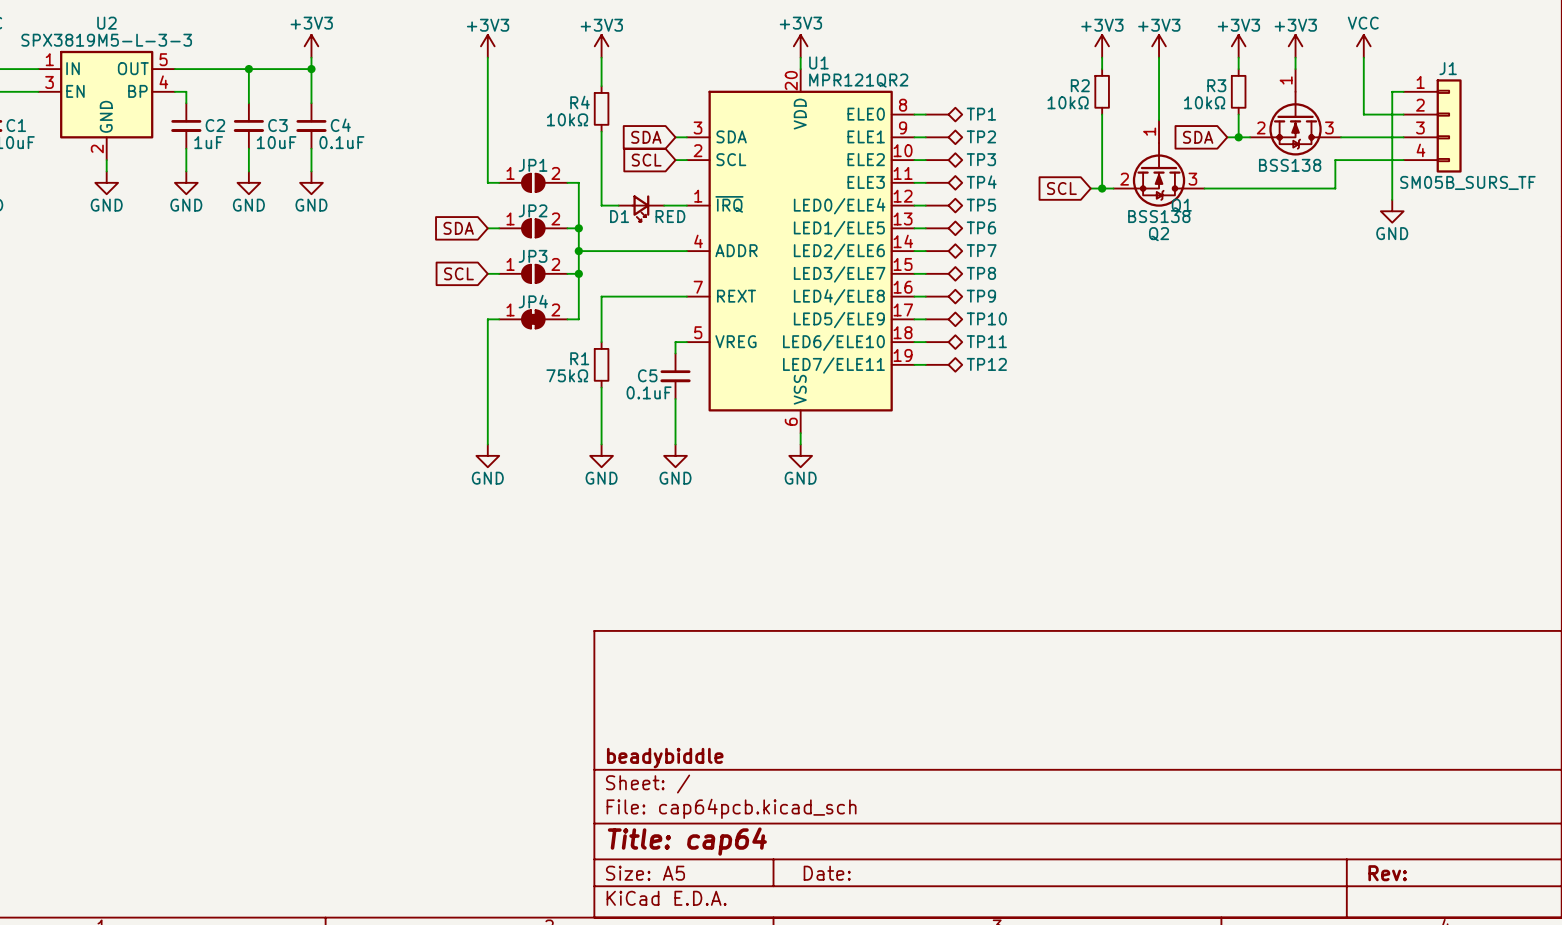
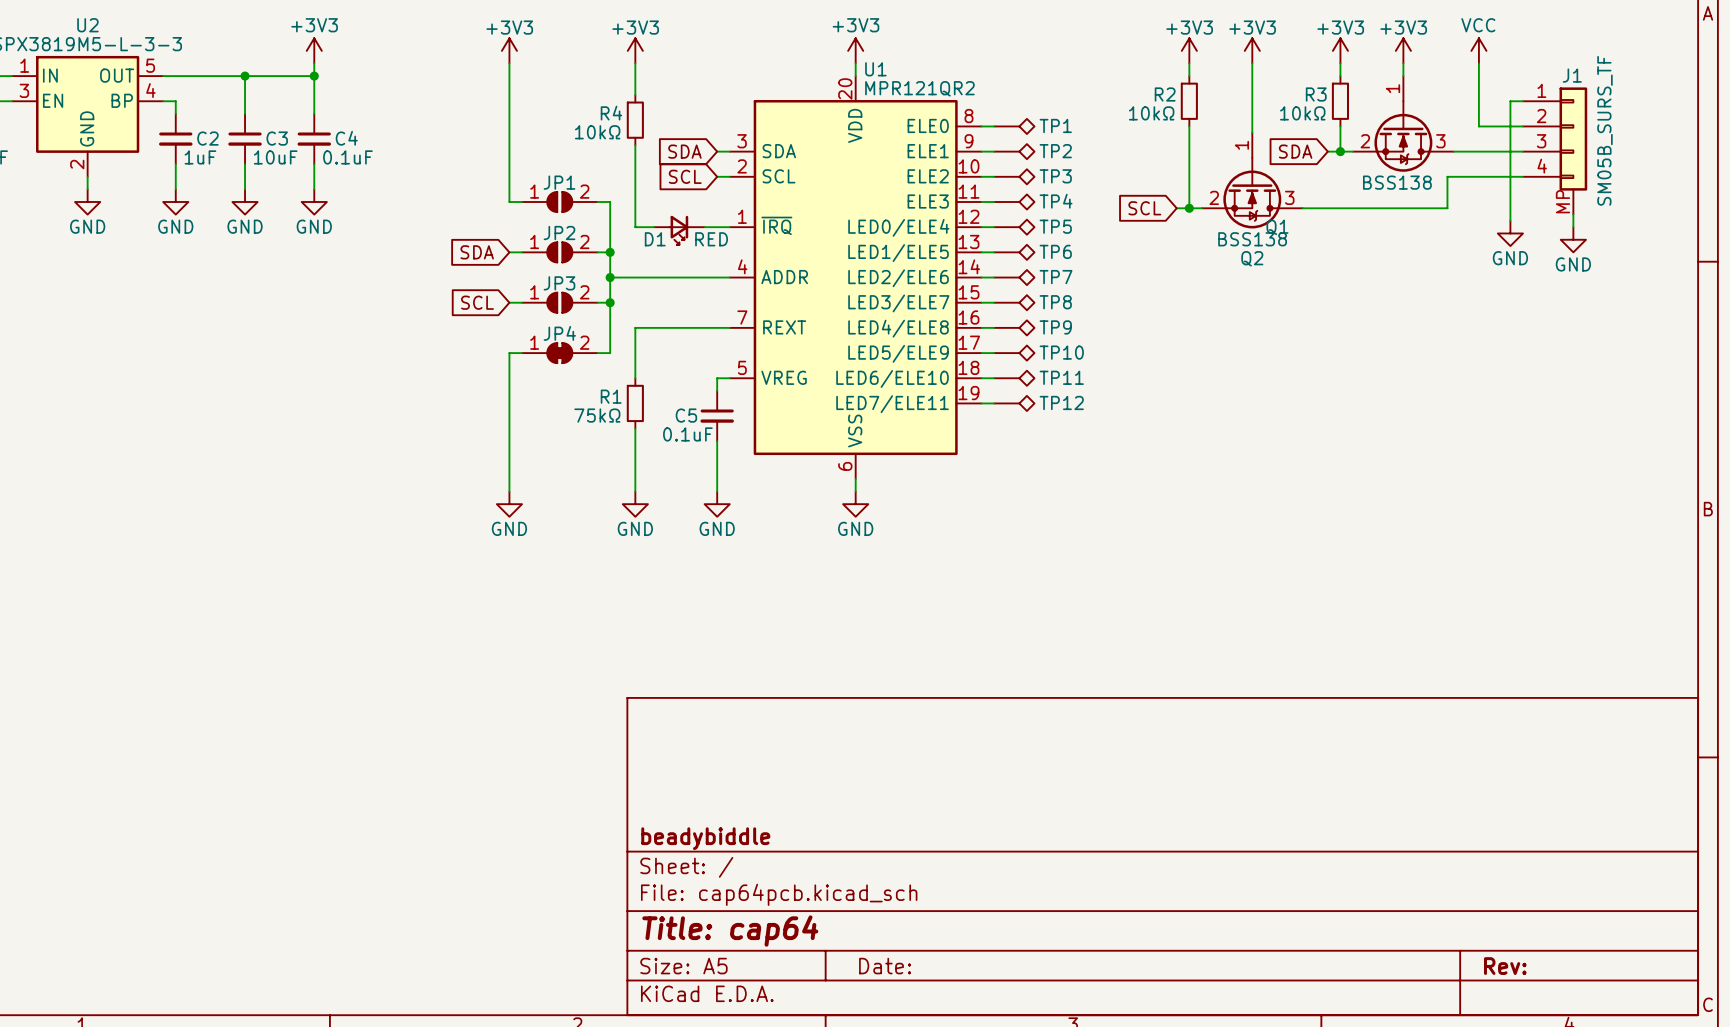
J1 symbol: [1403, 79, 1462, 173] -> [1523, 87, 1588, 215]
J1 value position: SM05B_SURS_TF (1467, 182) -> SM05B_SURS_TF (1604, 130)
wire: none -> (1573, 214) (1573, 227)
power symbol: none -> GND (1573, 239)

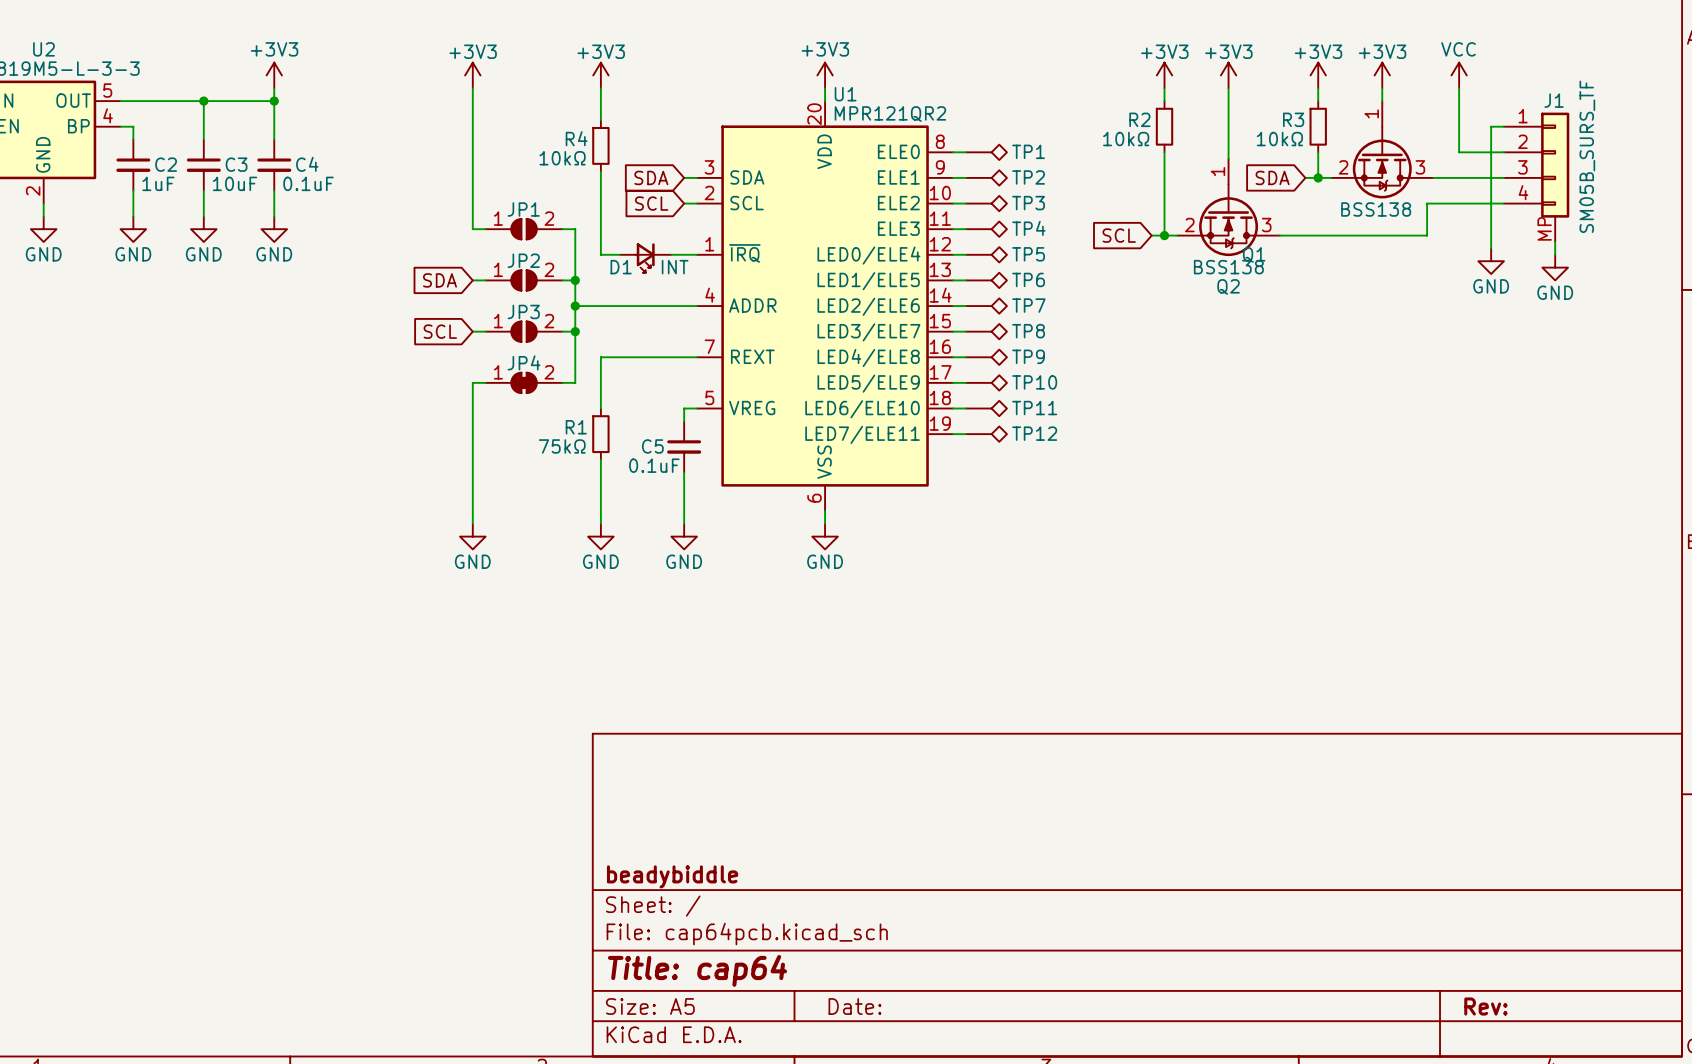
D1 value: RED (711, 239) -> INT (675, 267)

